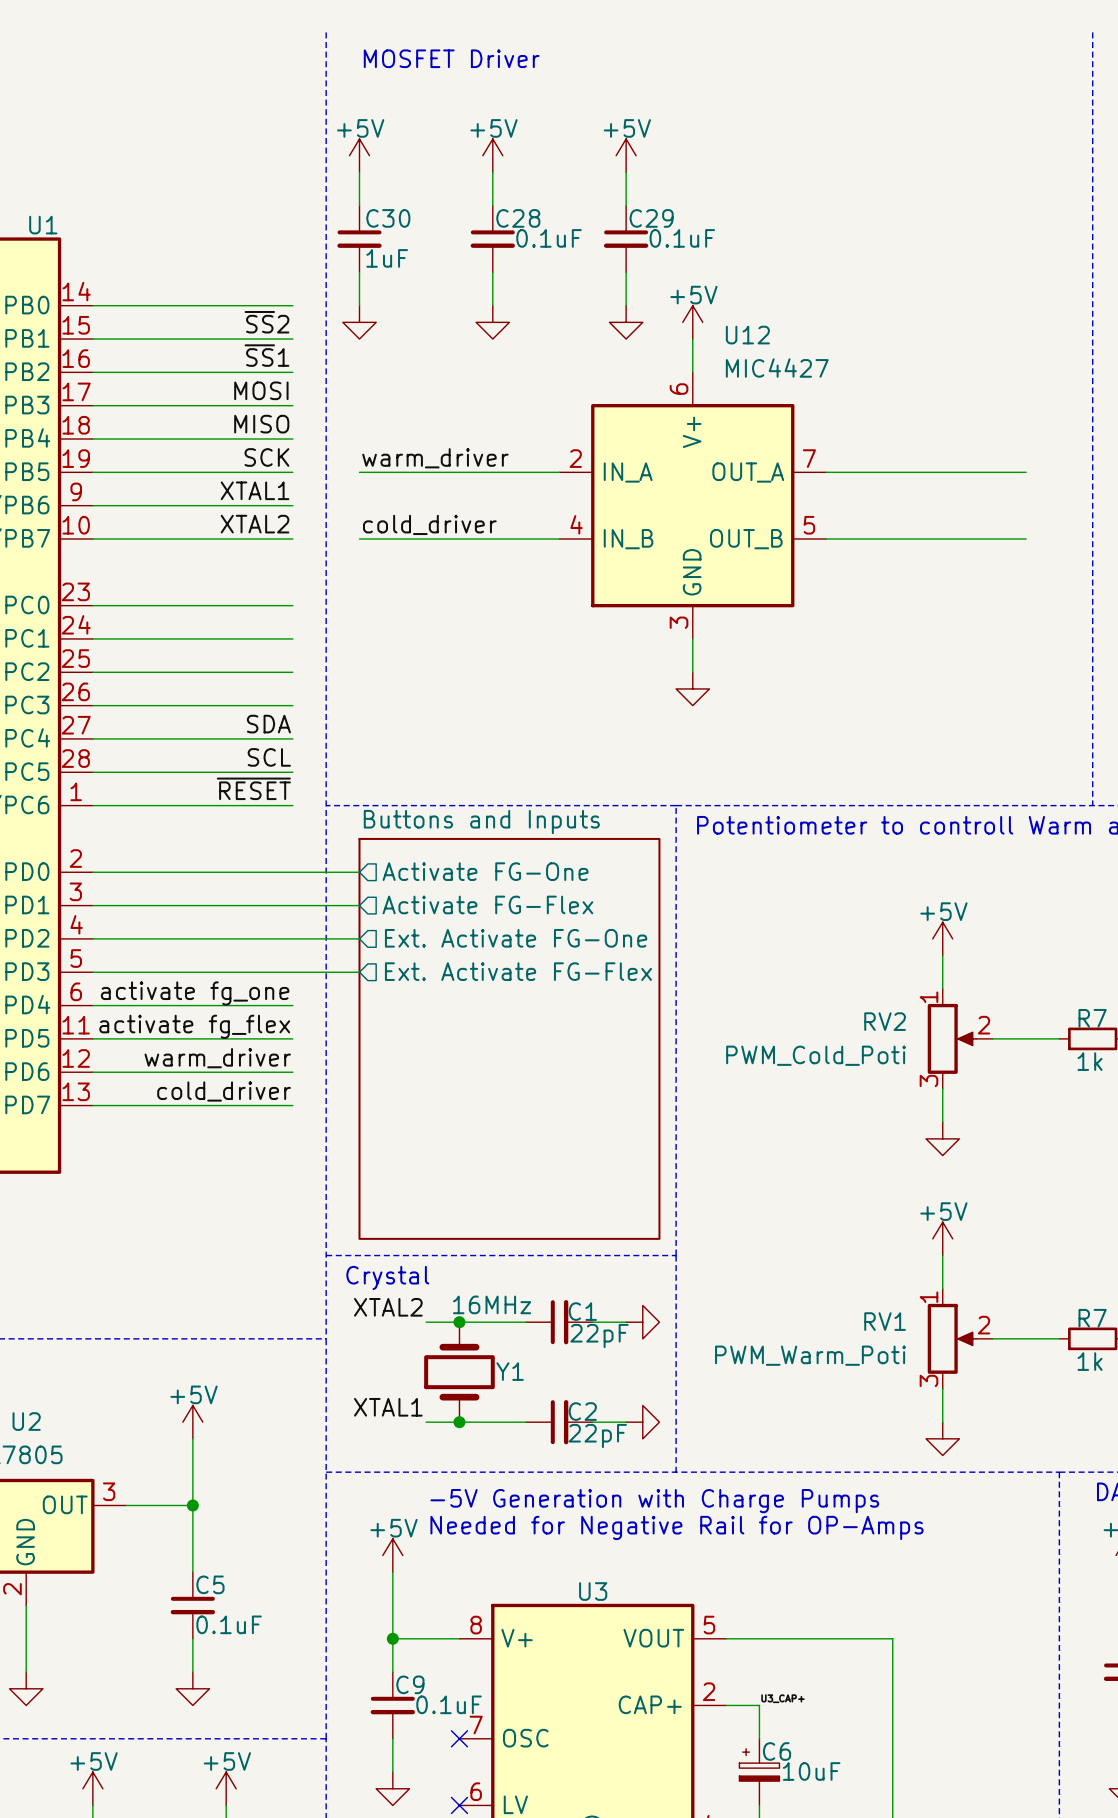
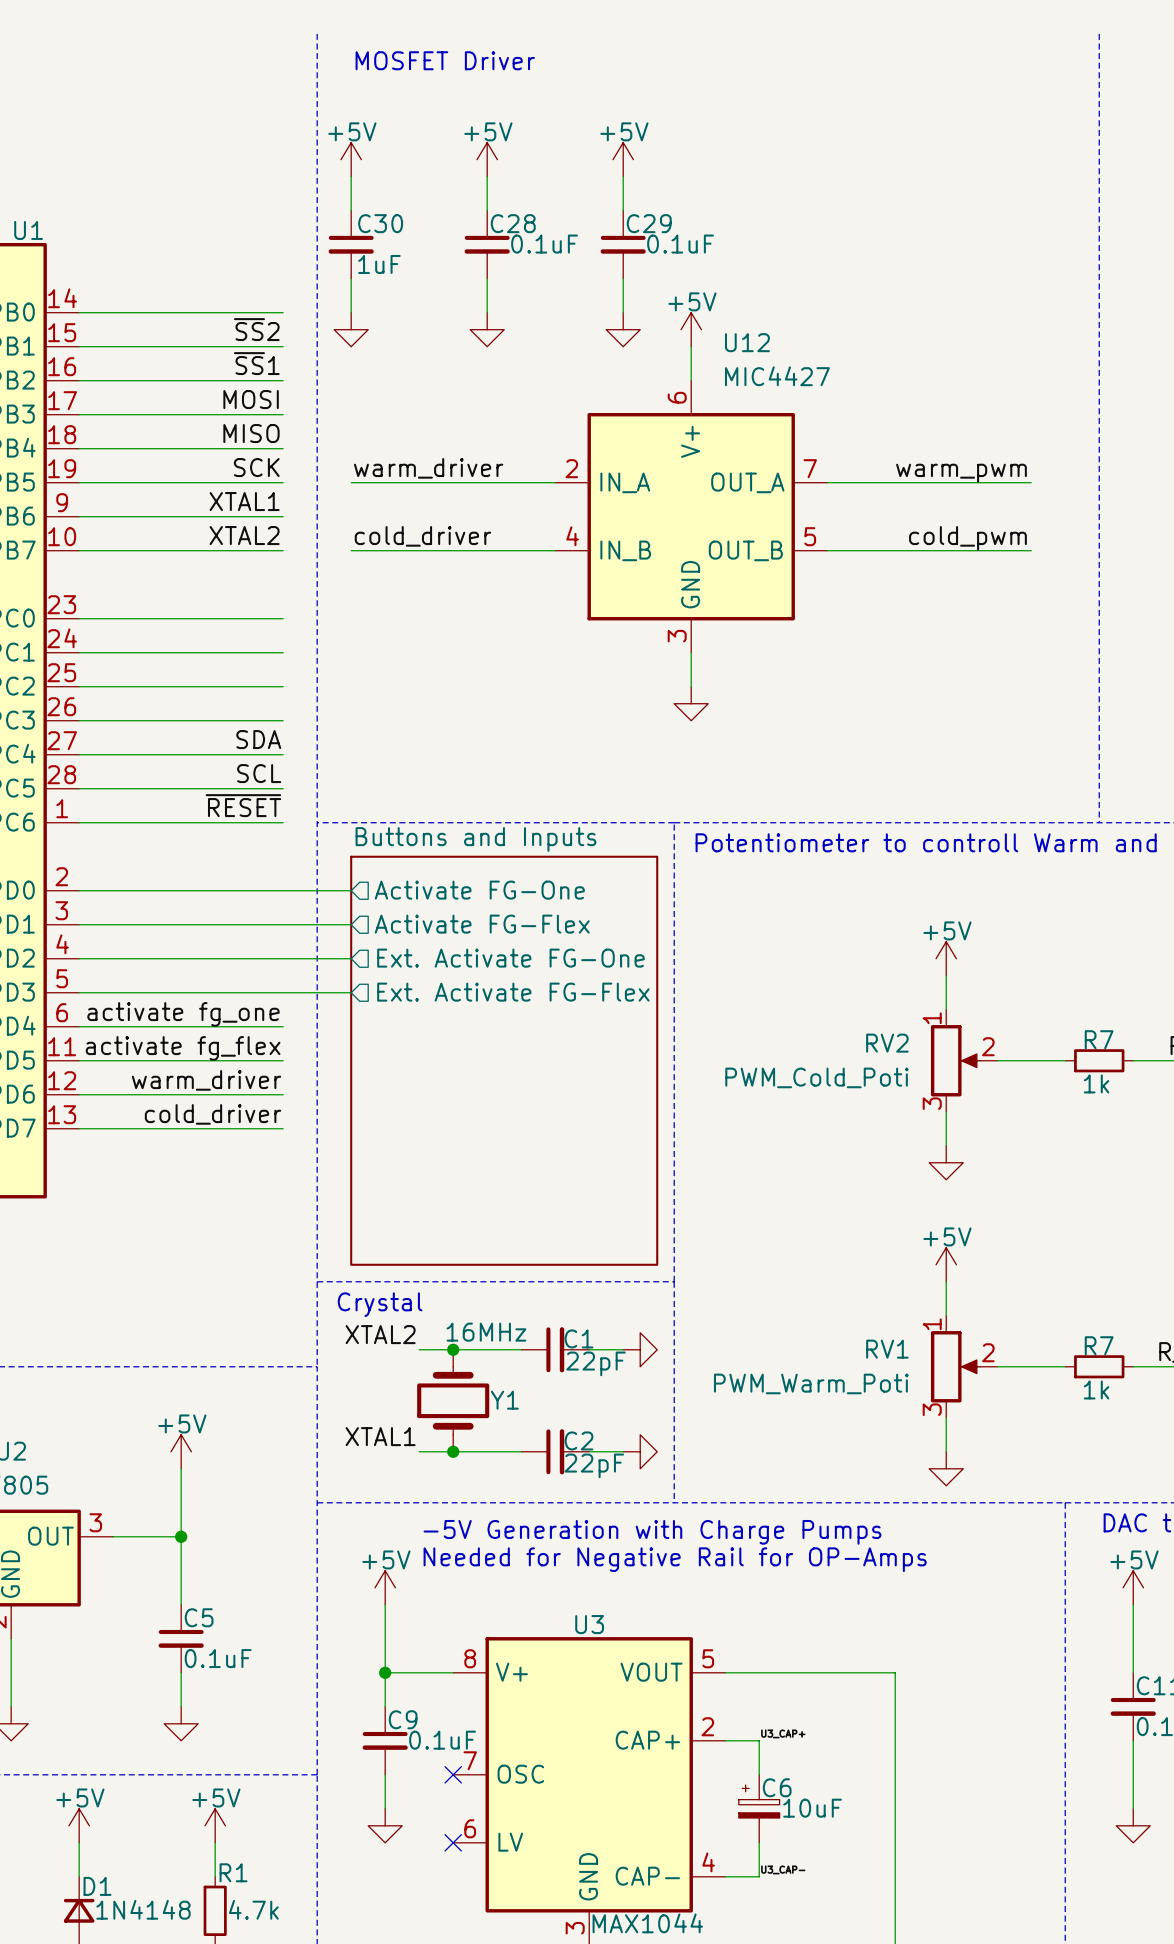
label: none -> warm_pwm (961, 473)
label: none -> cold_pwm (967, 538)

